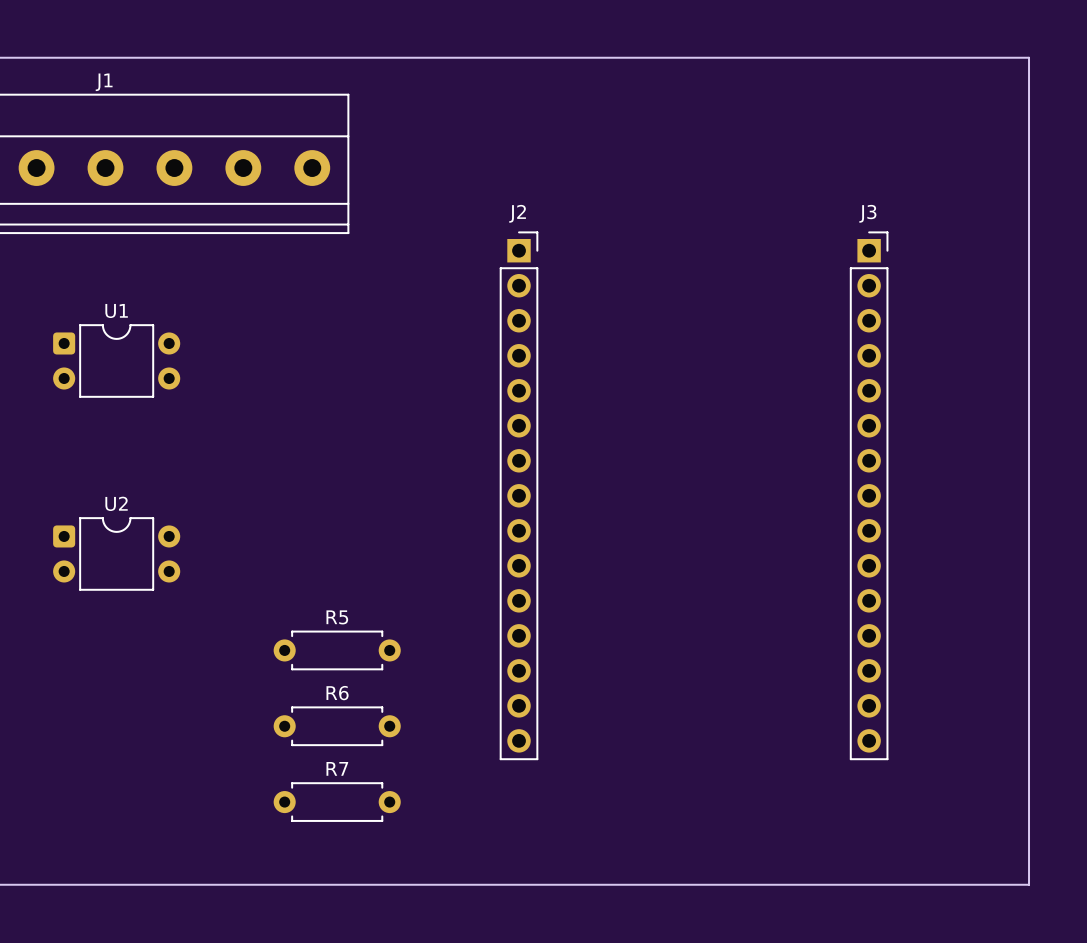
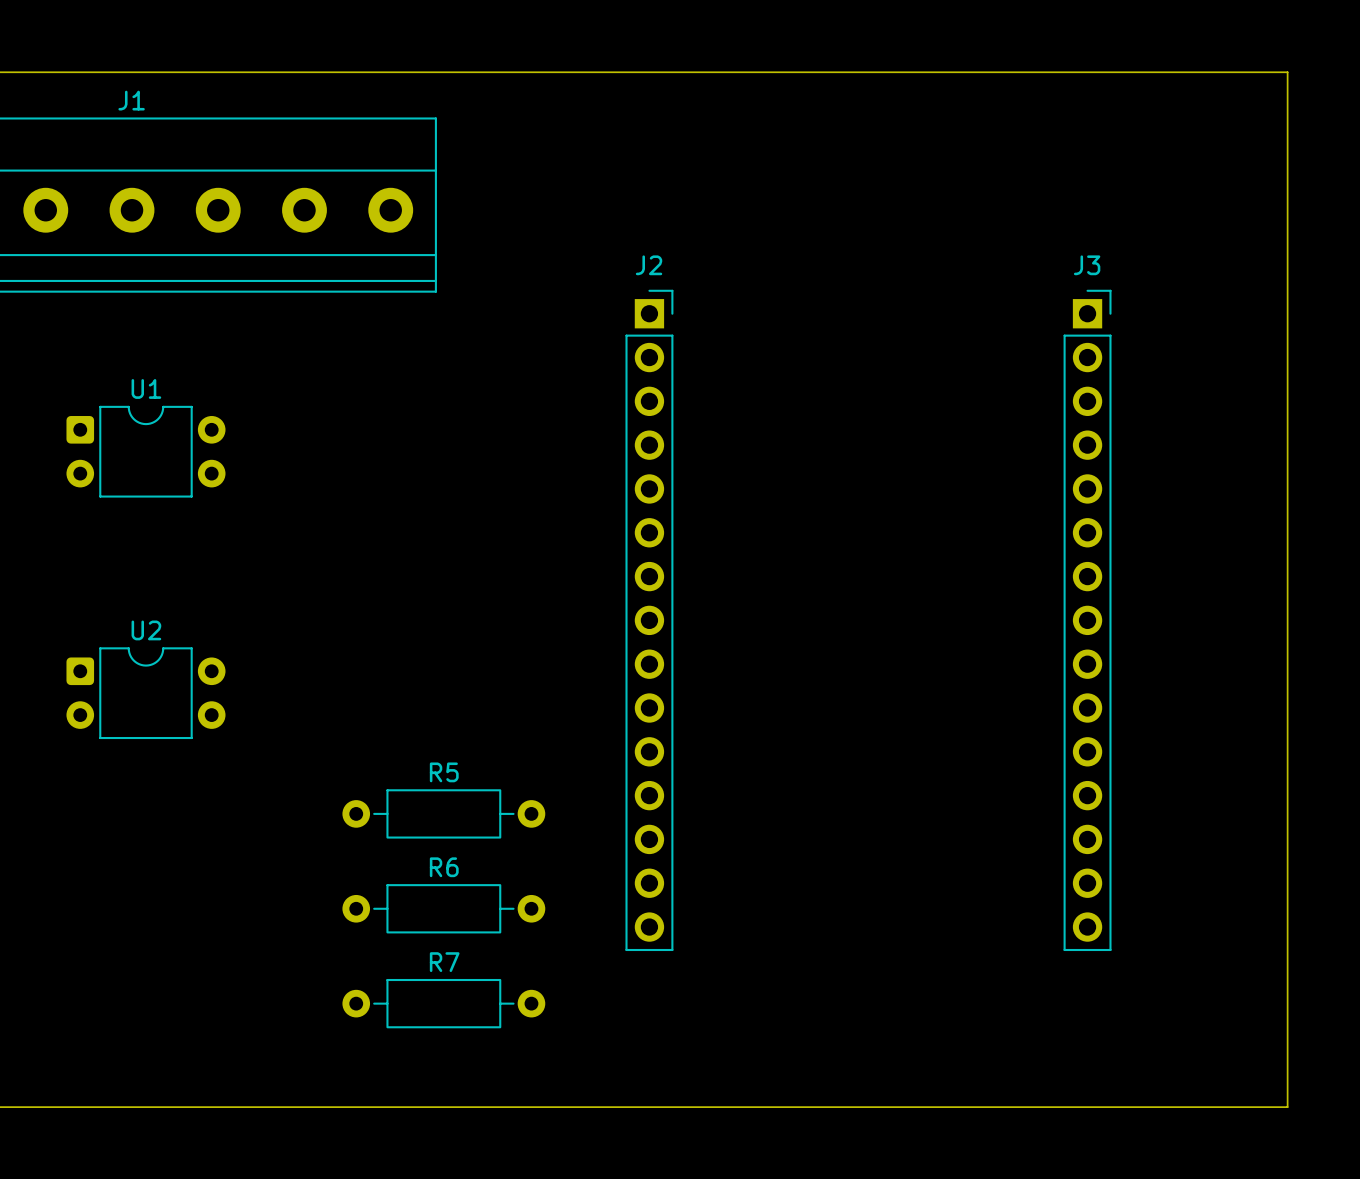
R5 footprint: [273, 630, 401, 671] -> [342, 789, 546, 839]
R6 footprint: [273, 706, 401, 746] -> [342, 884, 546, 934]
R7 footprint: [273, 782, 401, 822] -> [342, 978, 546, 1029]

